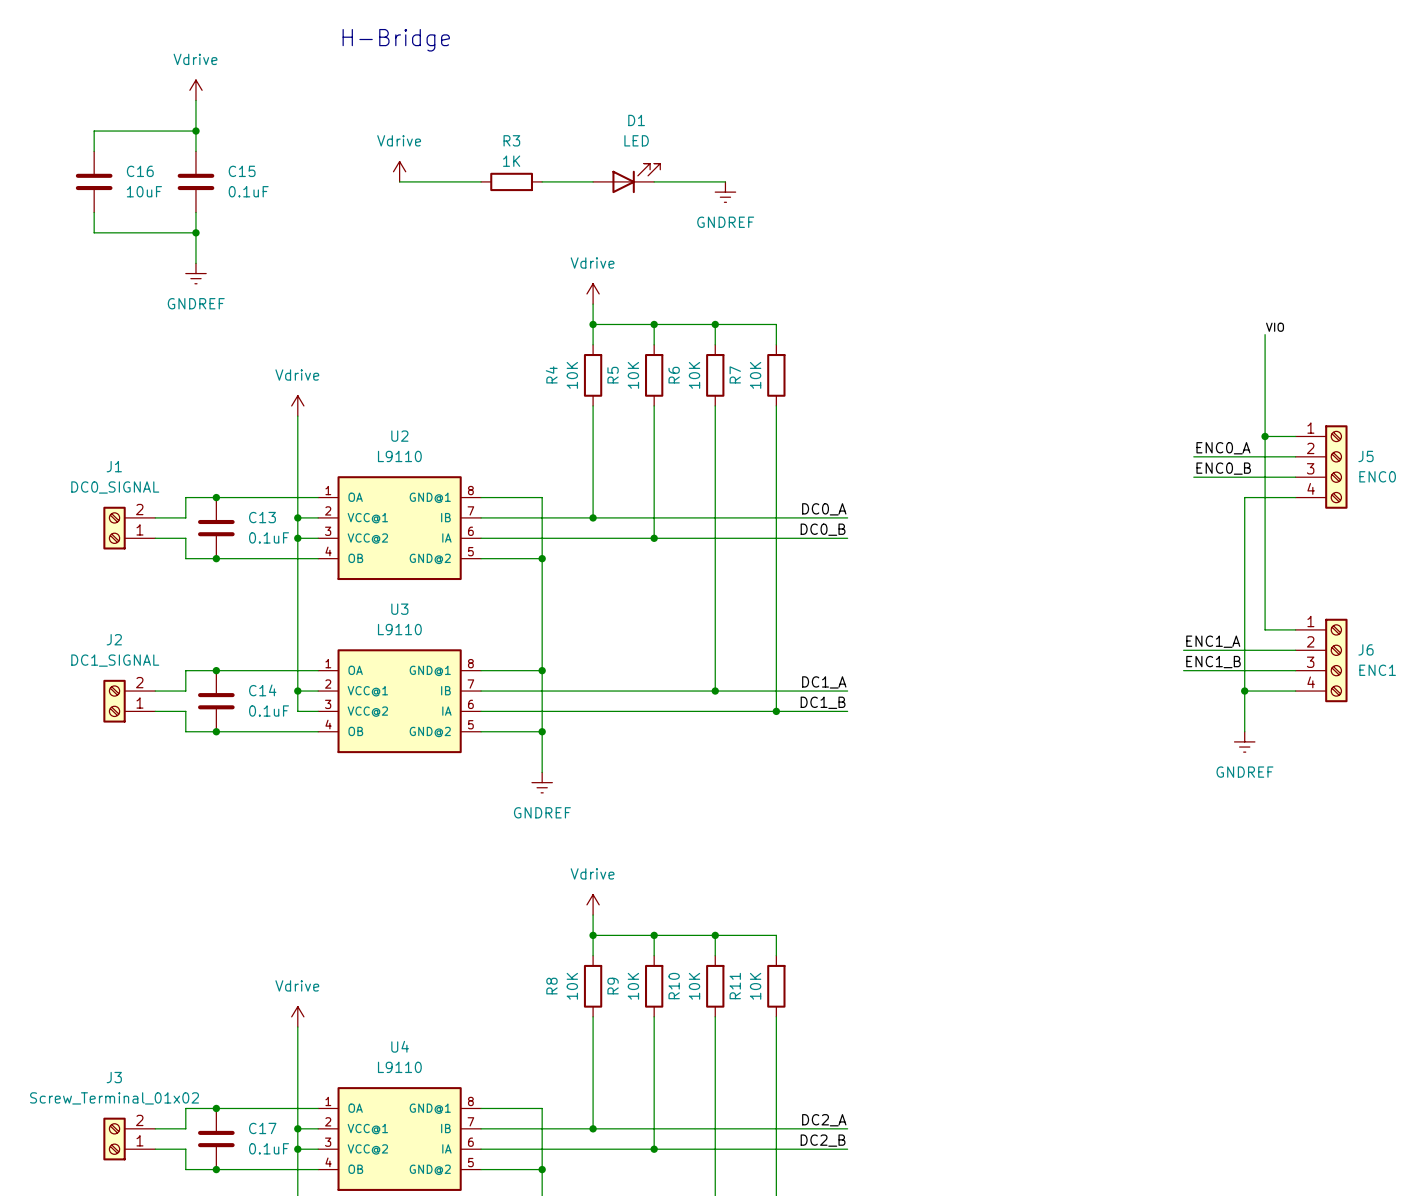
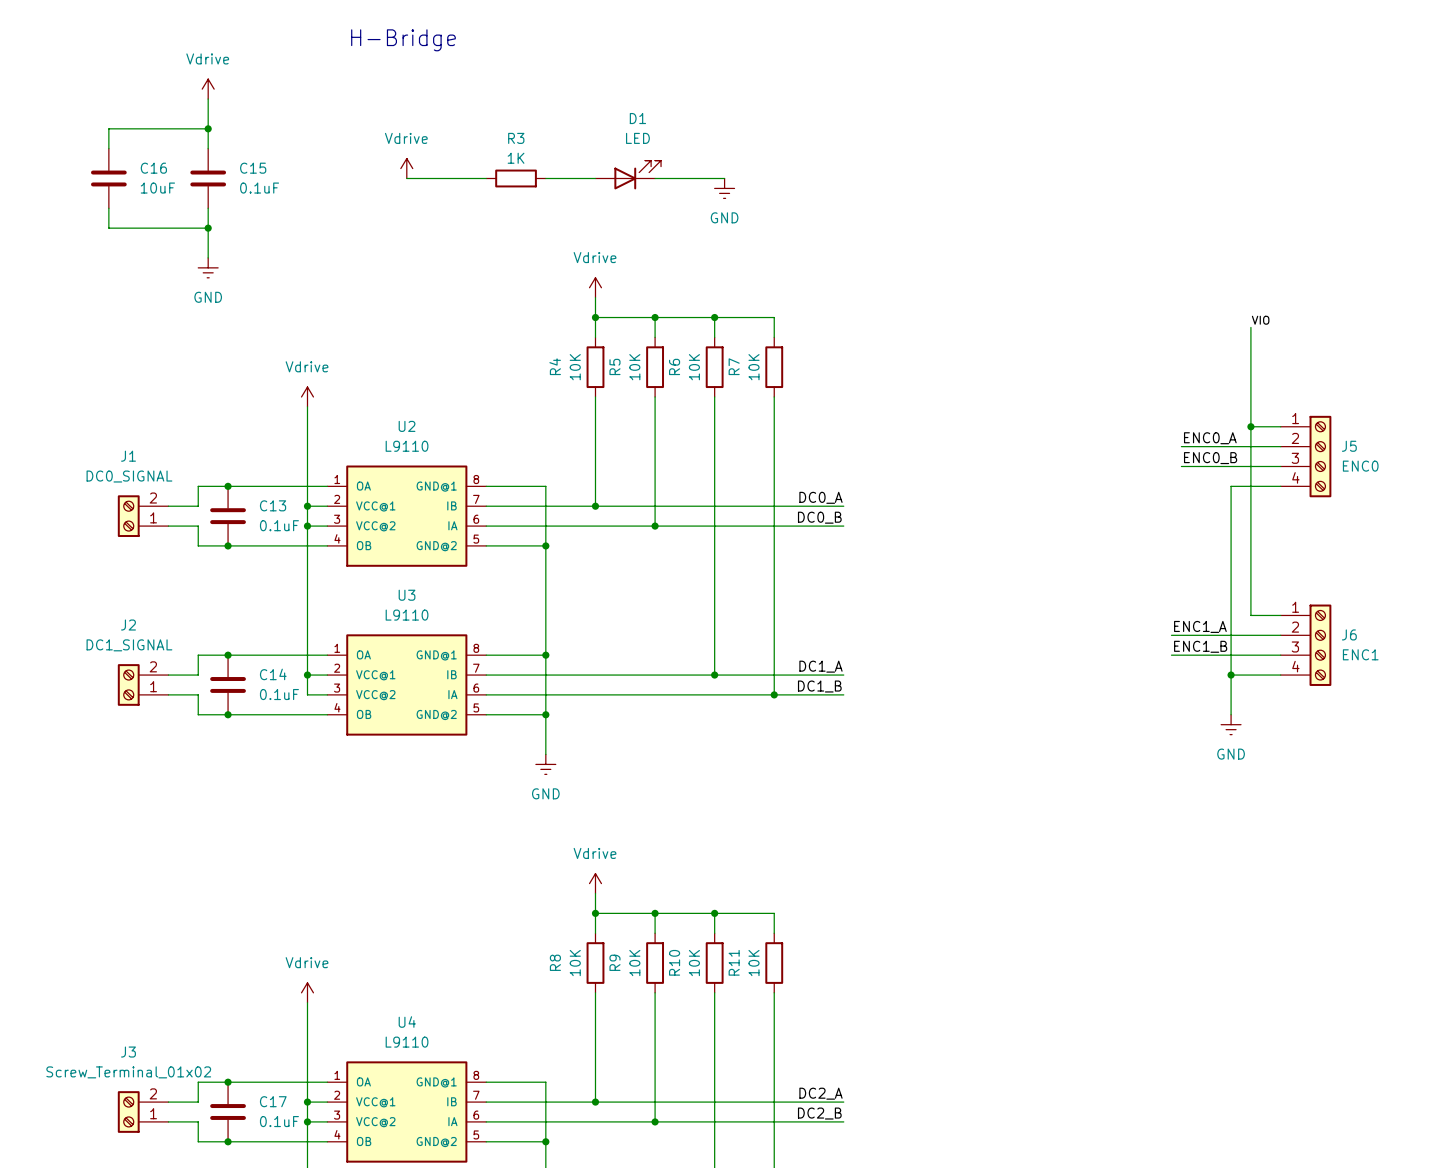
power symbol: GNDREF (725, 192) -> GND (724, 188)
power symbol: GNDREF (195, 273) -> GND (208, 267)
power symbol: GNDREF (1244, 741) -> GND (1231, 724)
power symbol: GNDREF (542, 782) -> GND (545, 764)

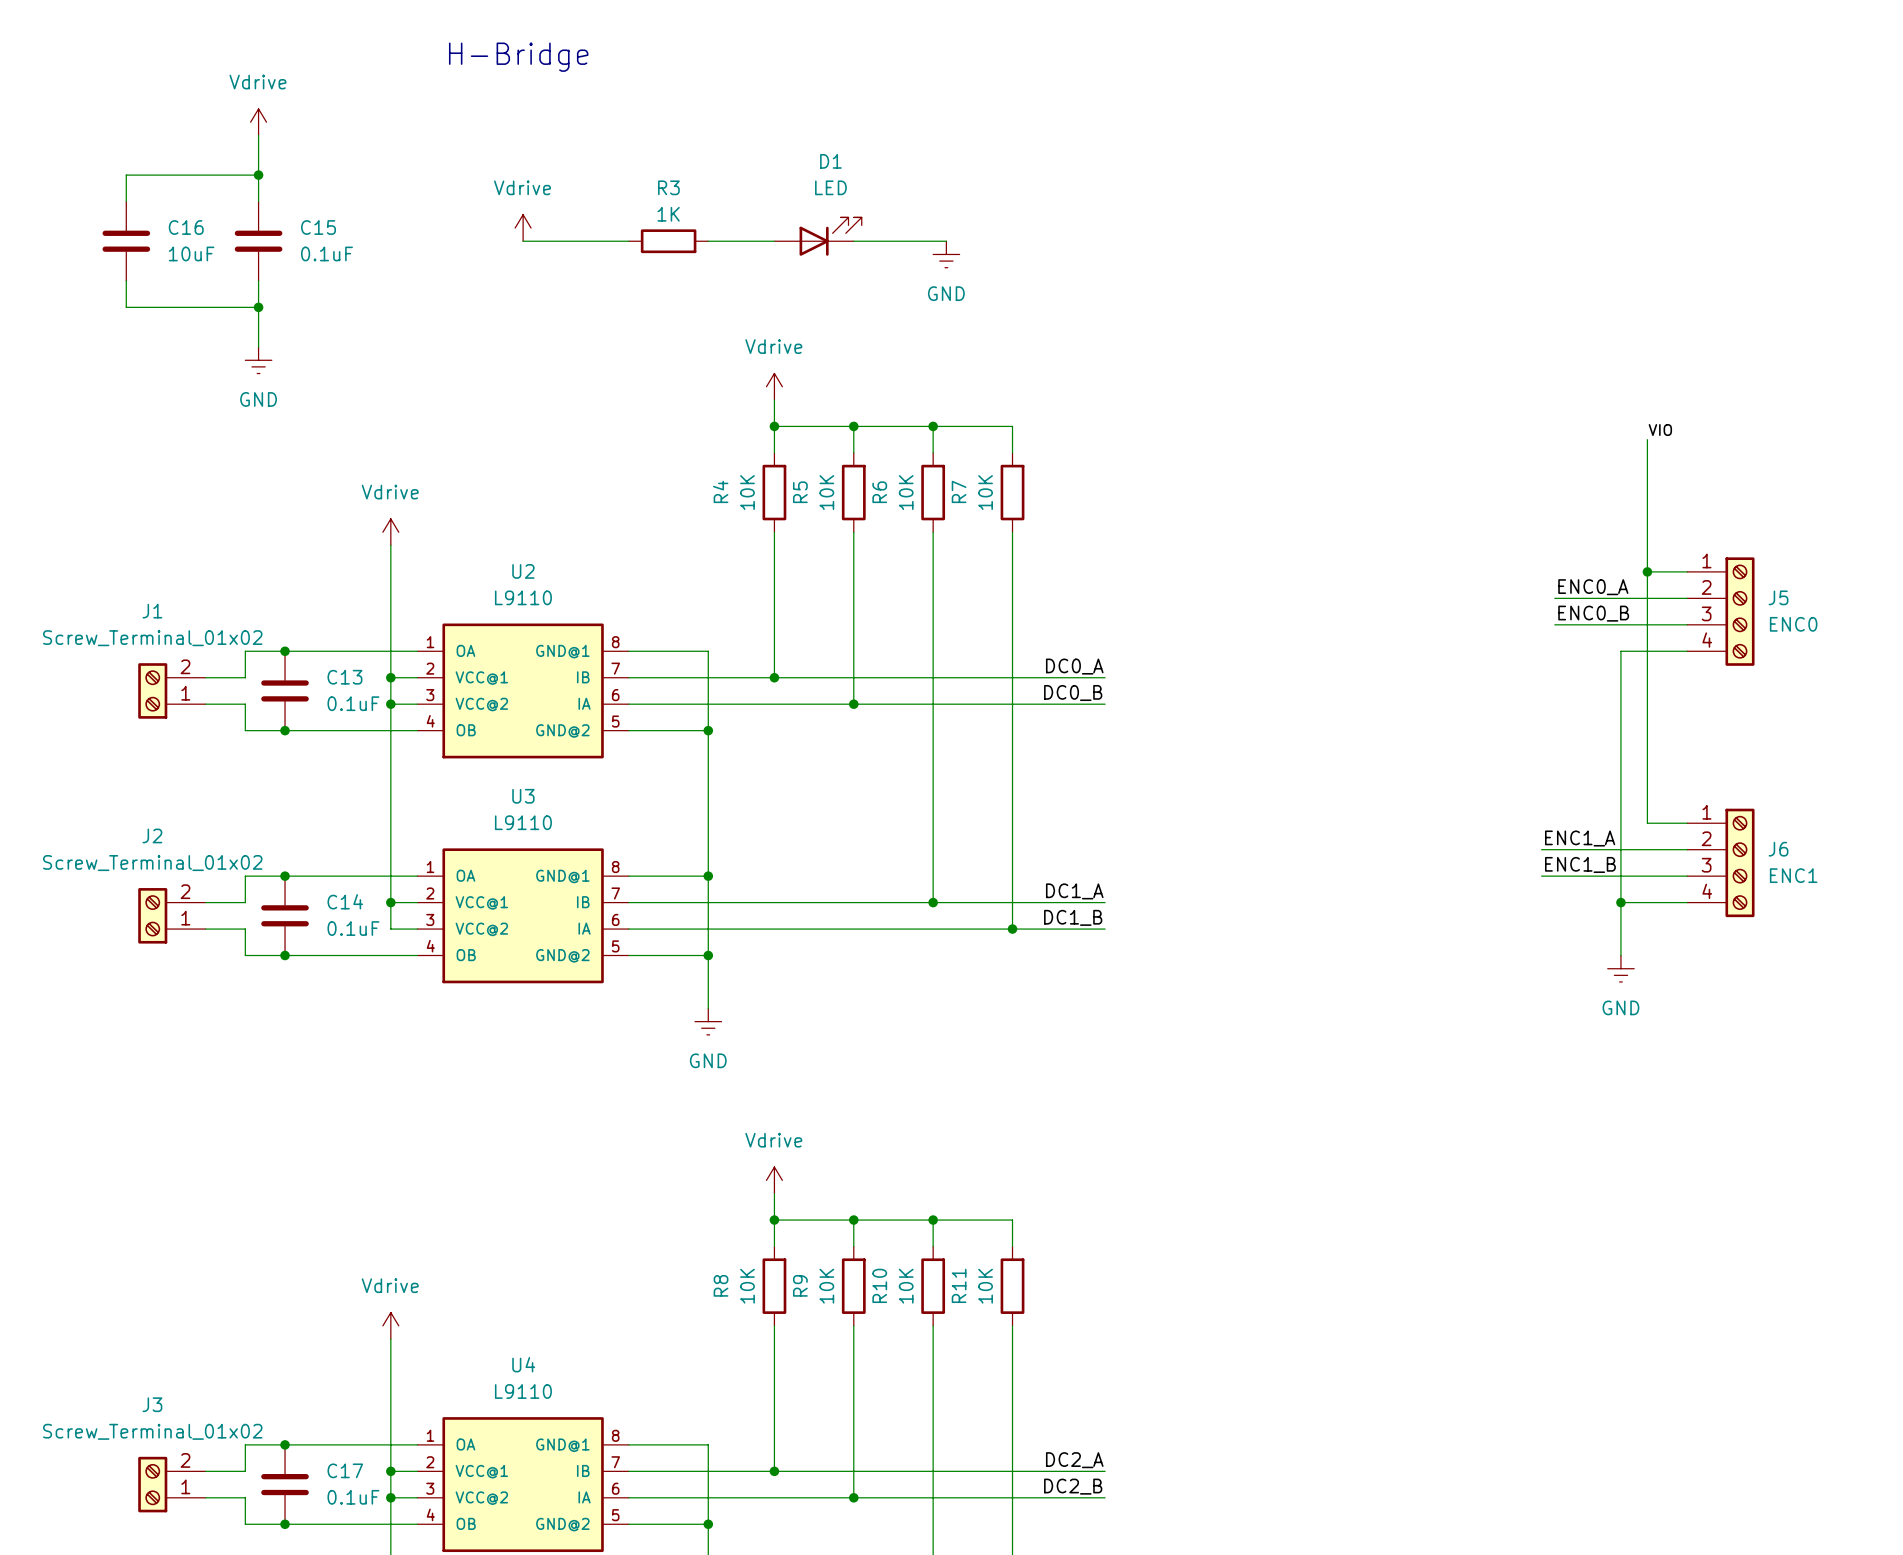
J1 value: DC0_SIGNAL (129, 476) -> Screw_Terminal_01x02 (152, 638)
J2 value: DC1_SIGNAL (129, 645) -> Screw_Terminal_01x02 (152, 863)

